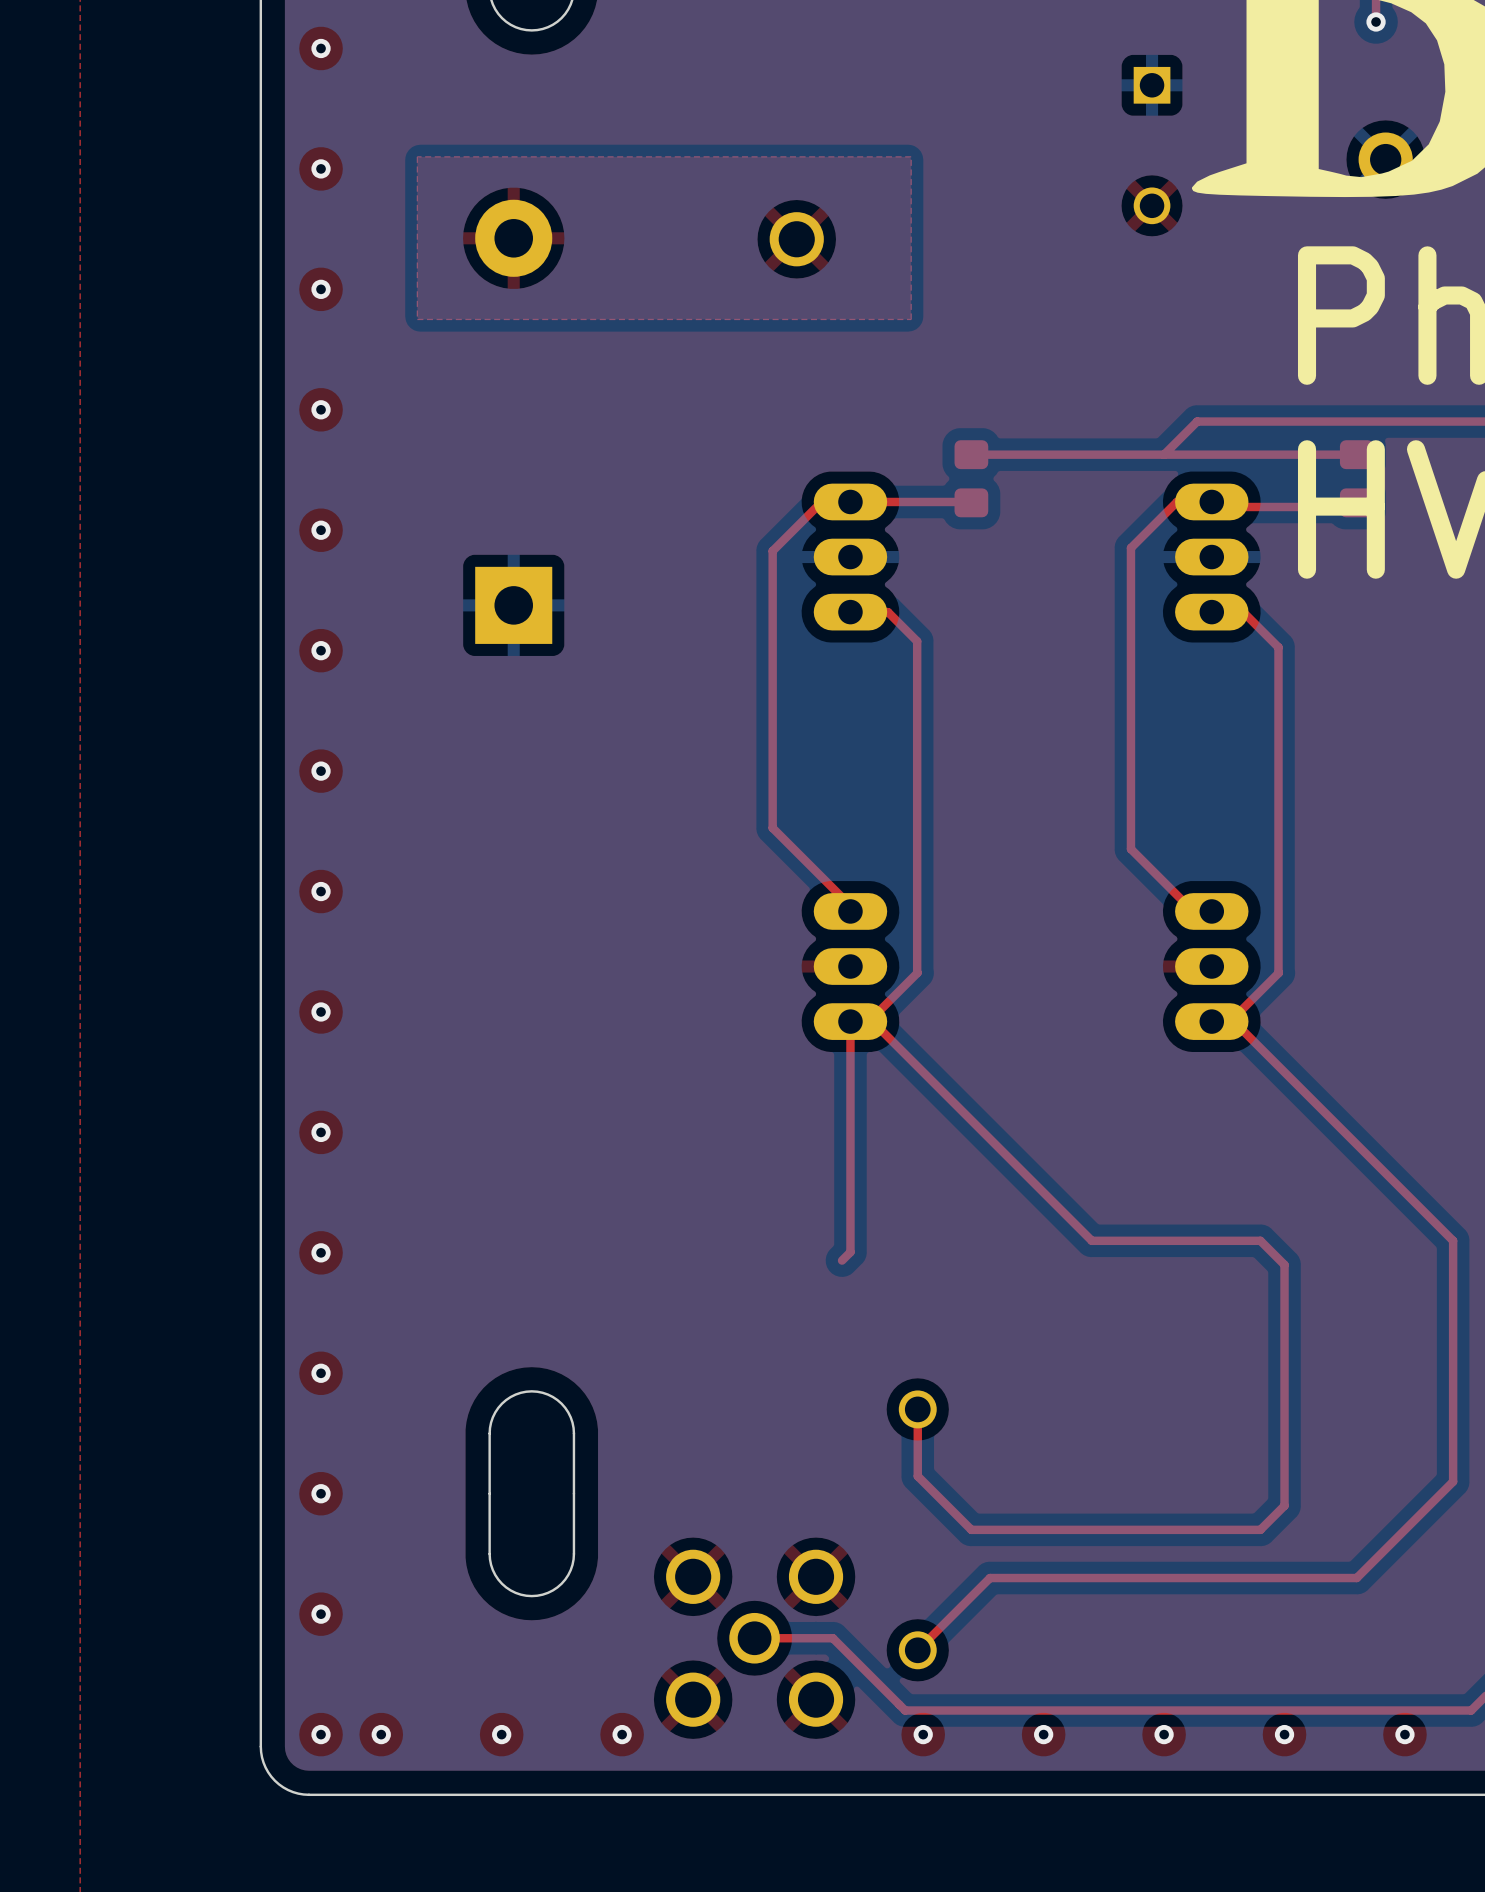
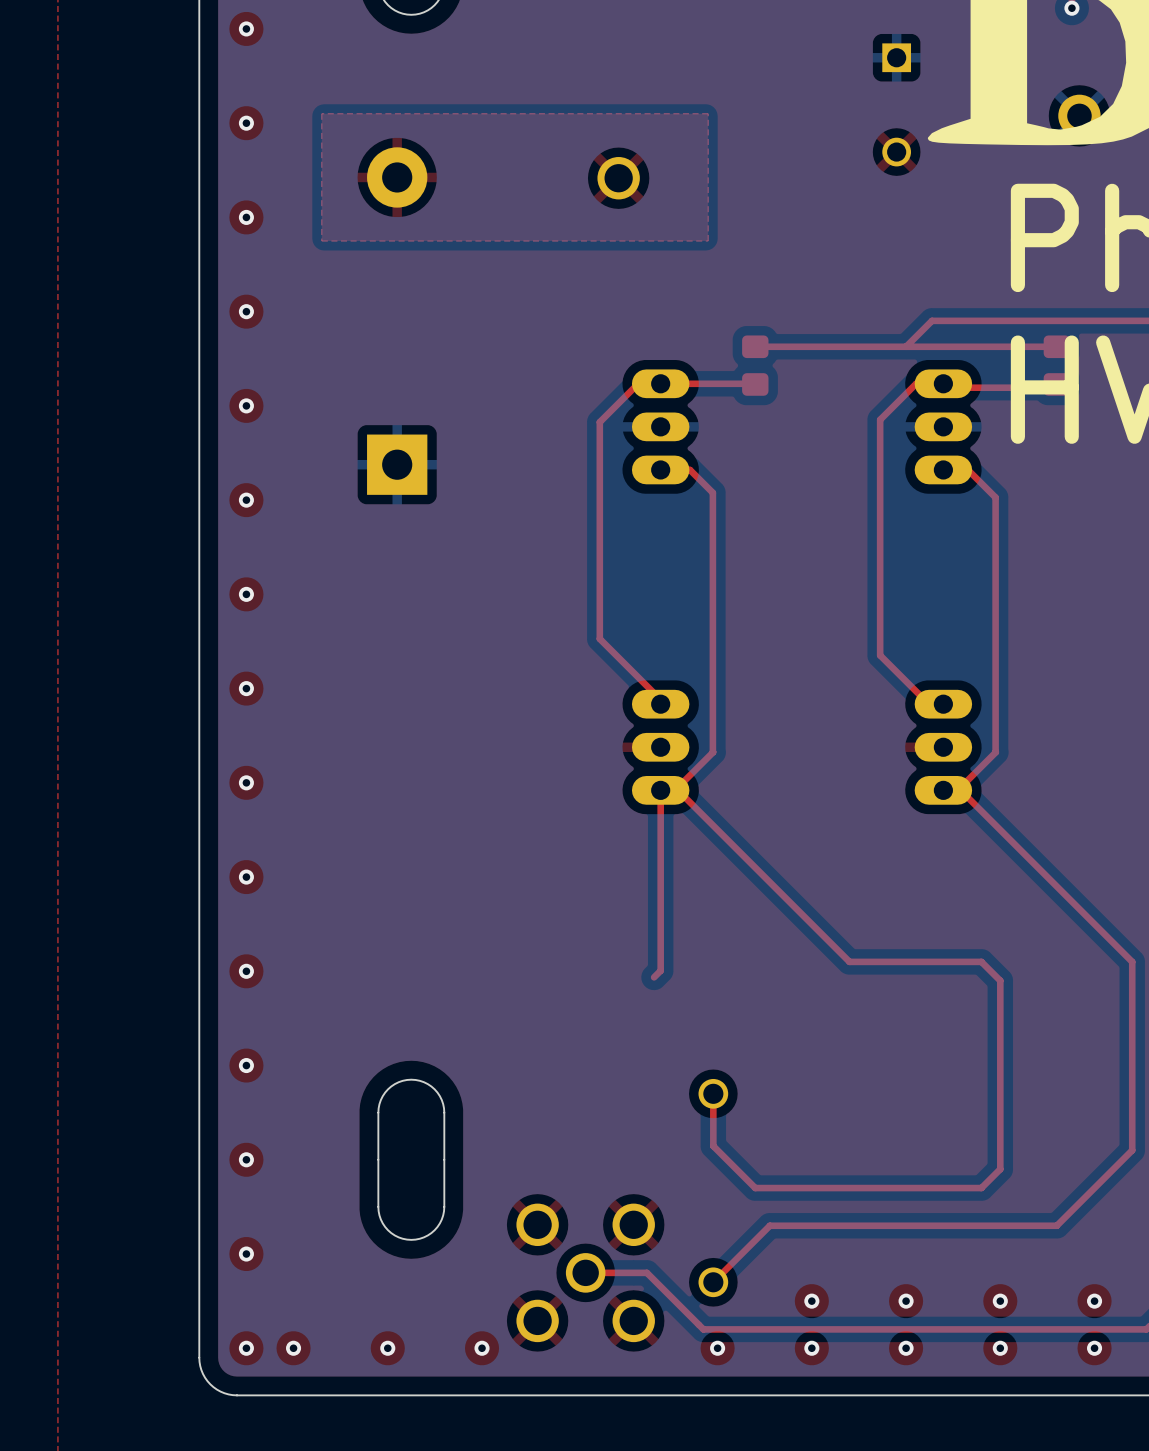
via: none -> (811, 1301)
via: none -> (906, 1301)
via: none -> (1000, 1301)
via: none -> (1094, 1301)

